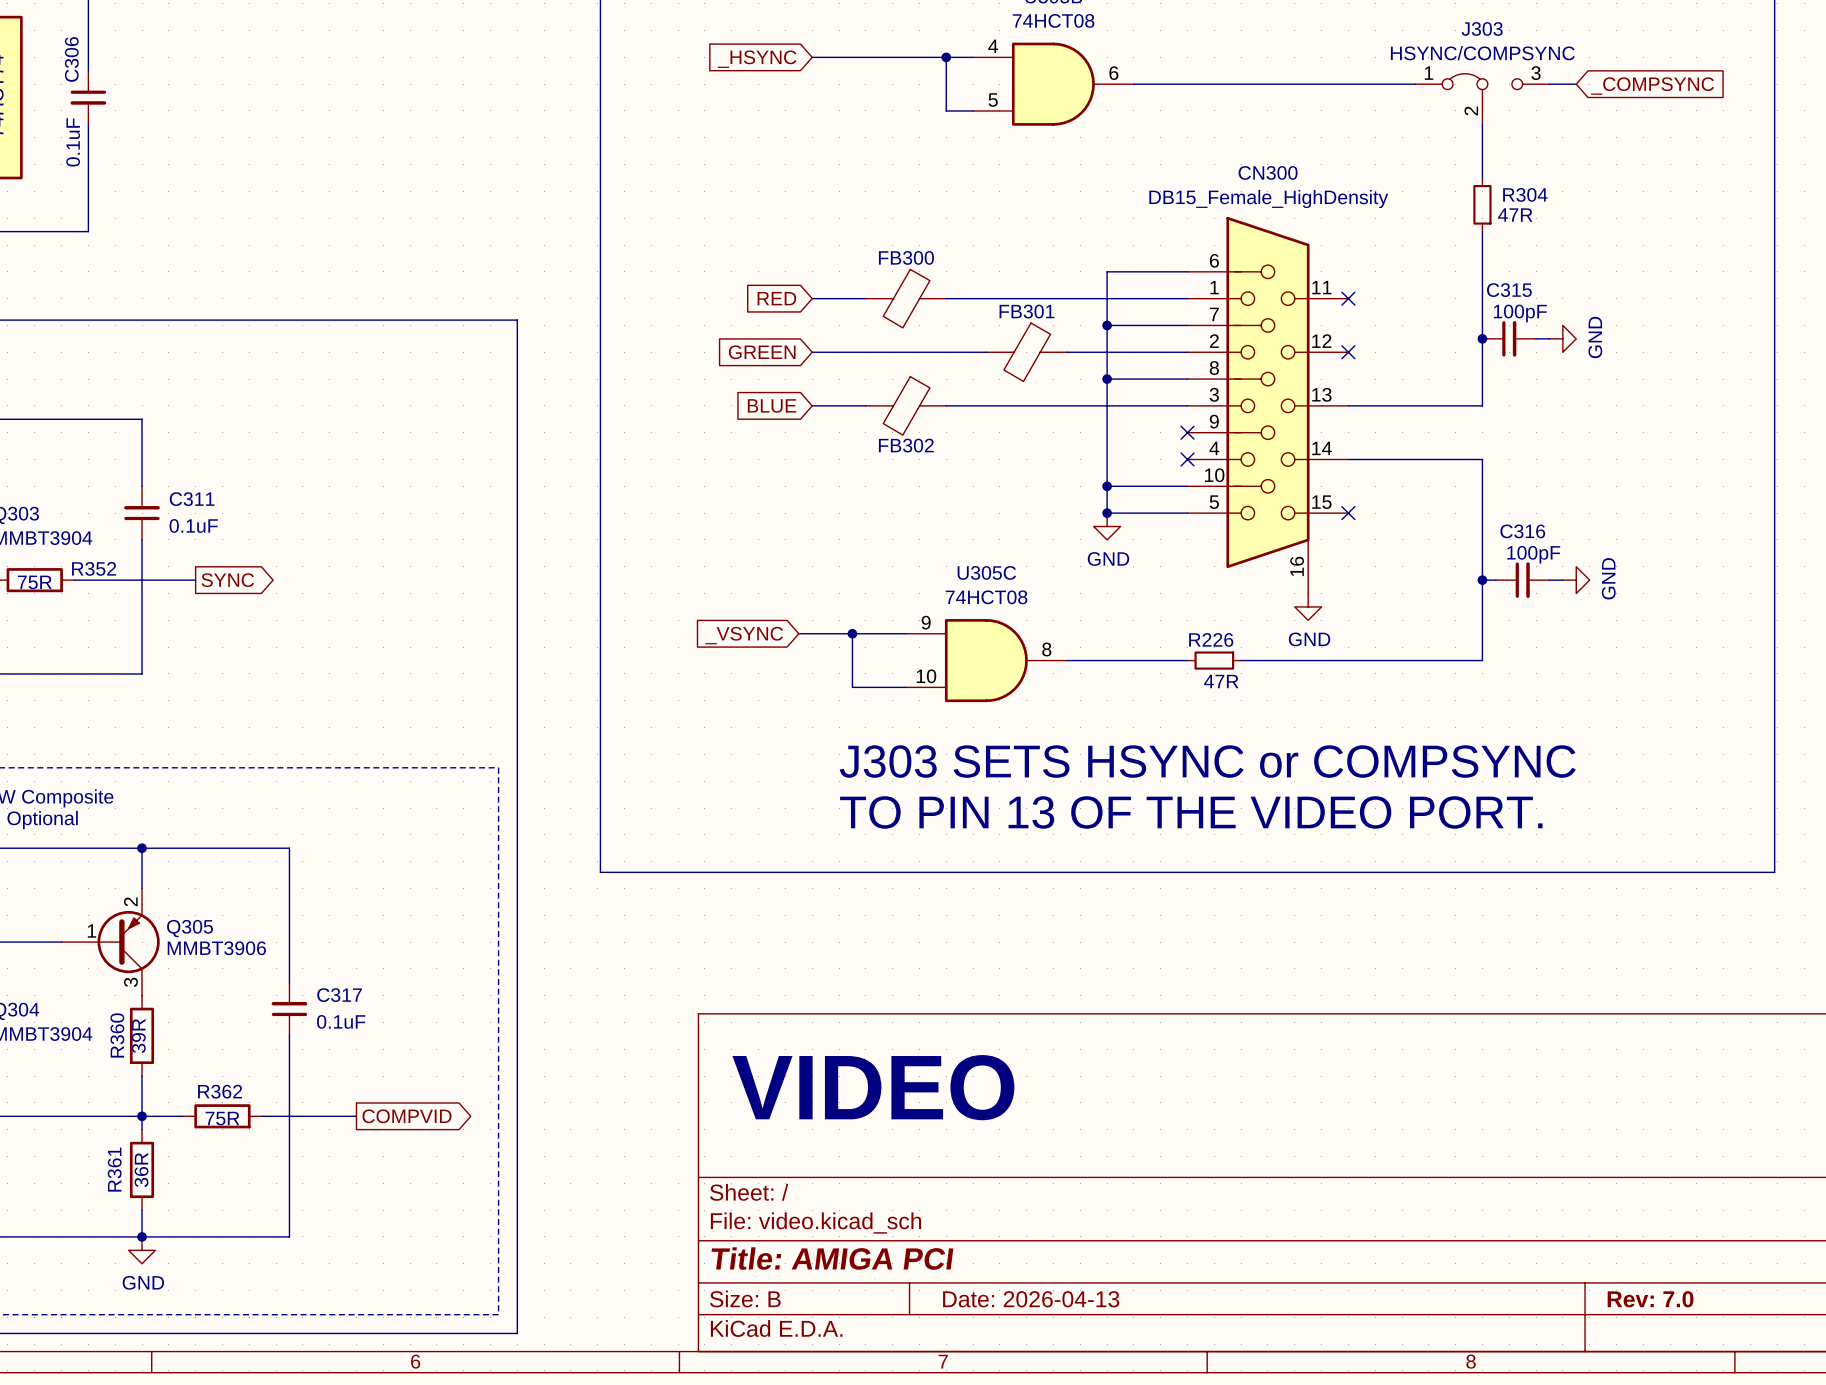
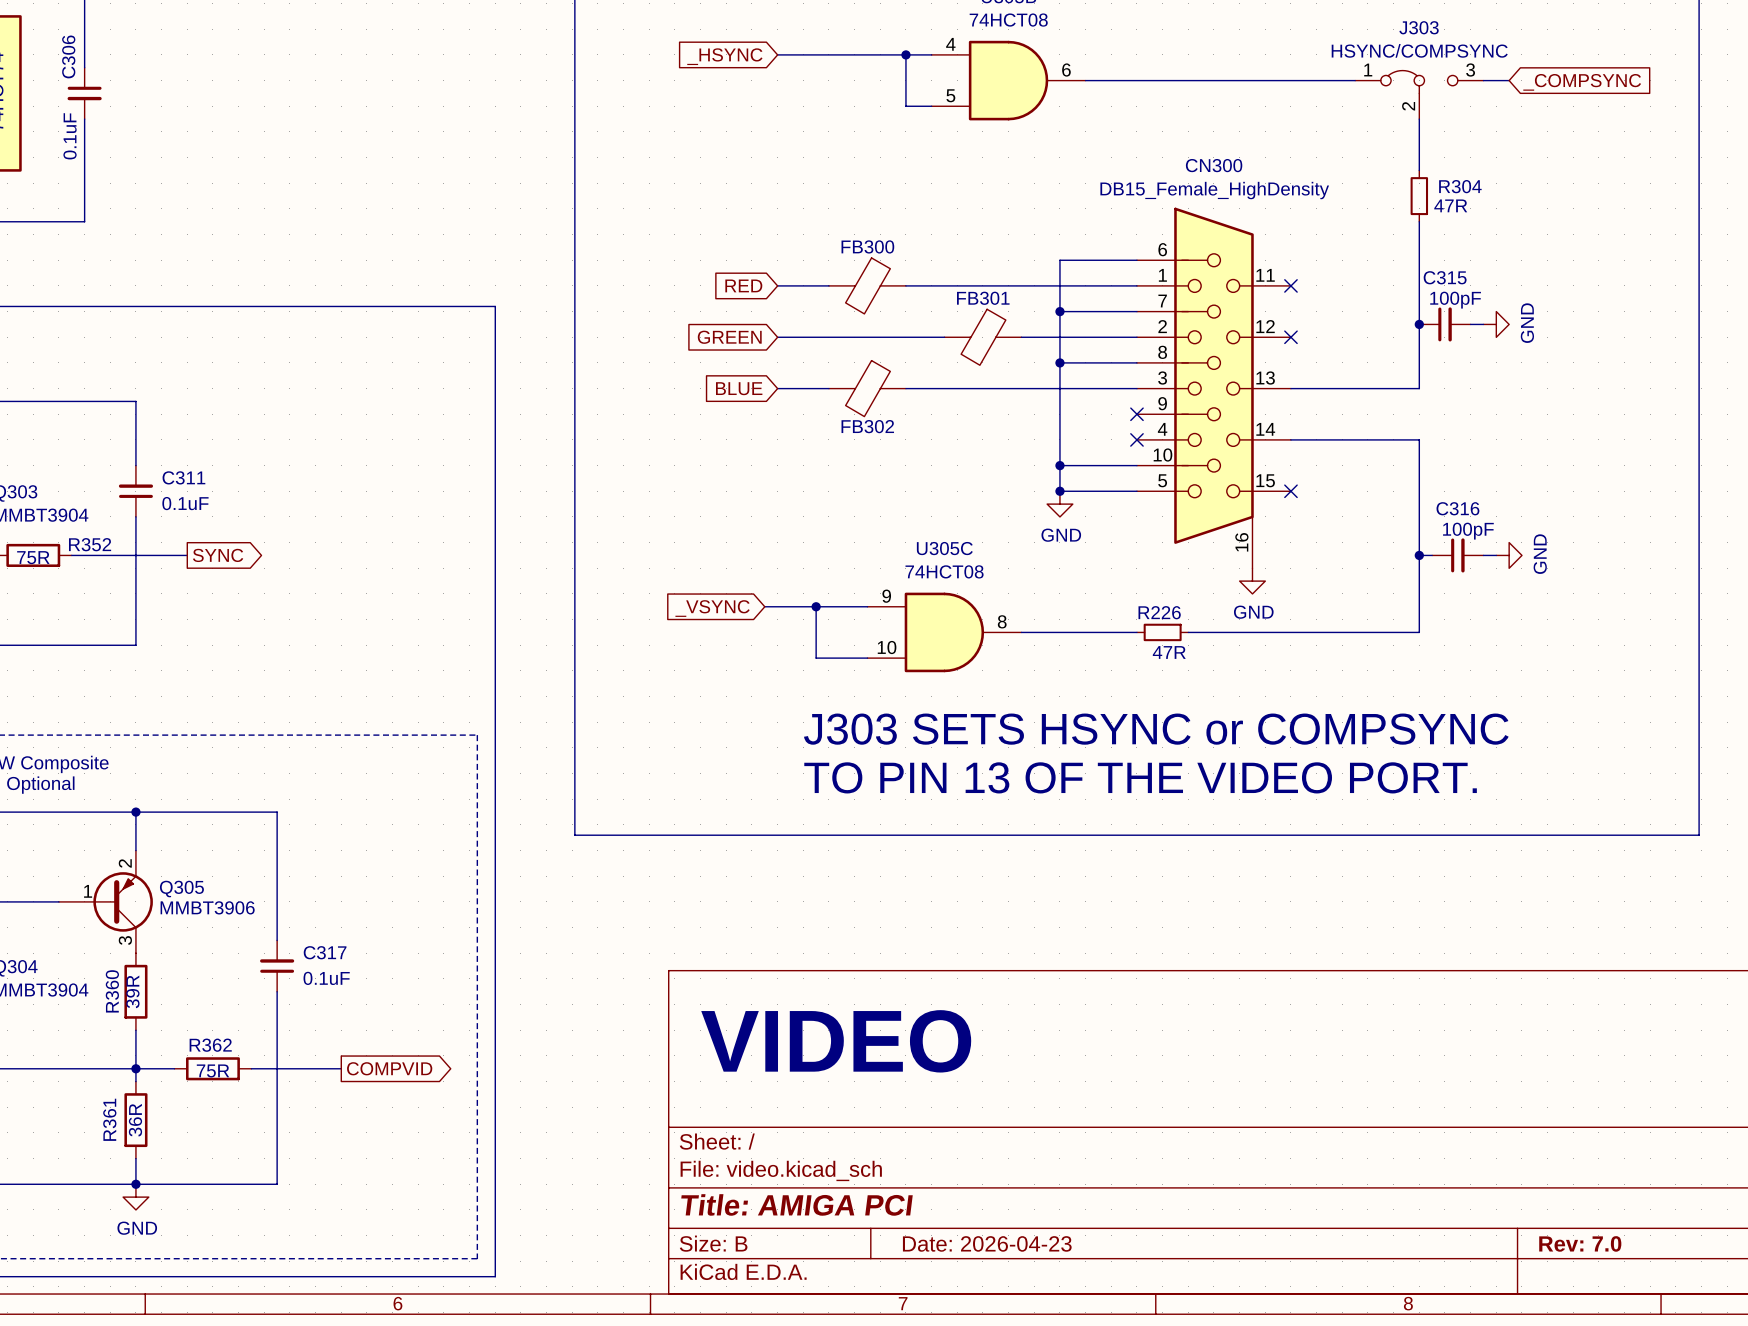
title block: Date: 2026-04-13 (1031, 1299) -> Date: 2026-04-23 (987, 1243)

